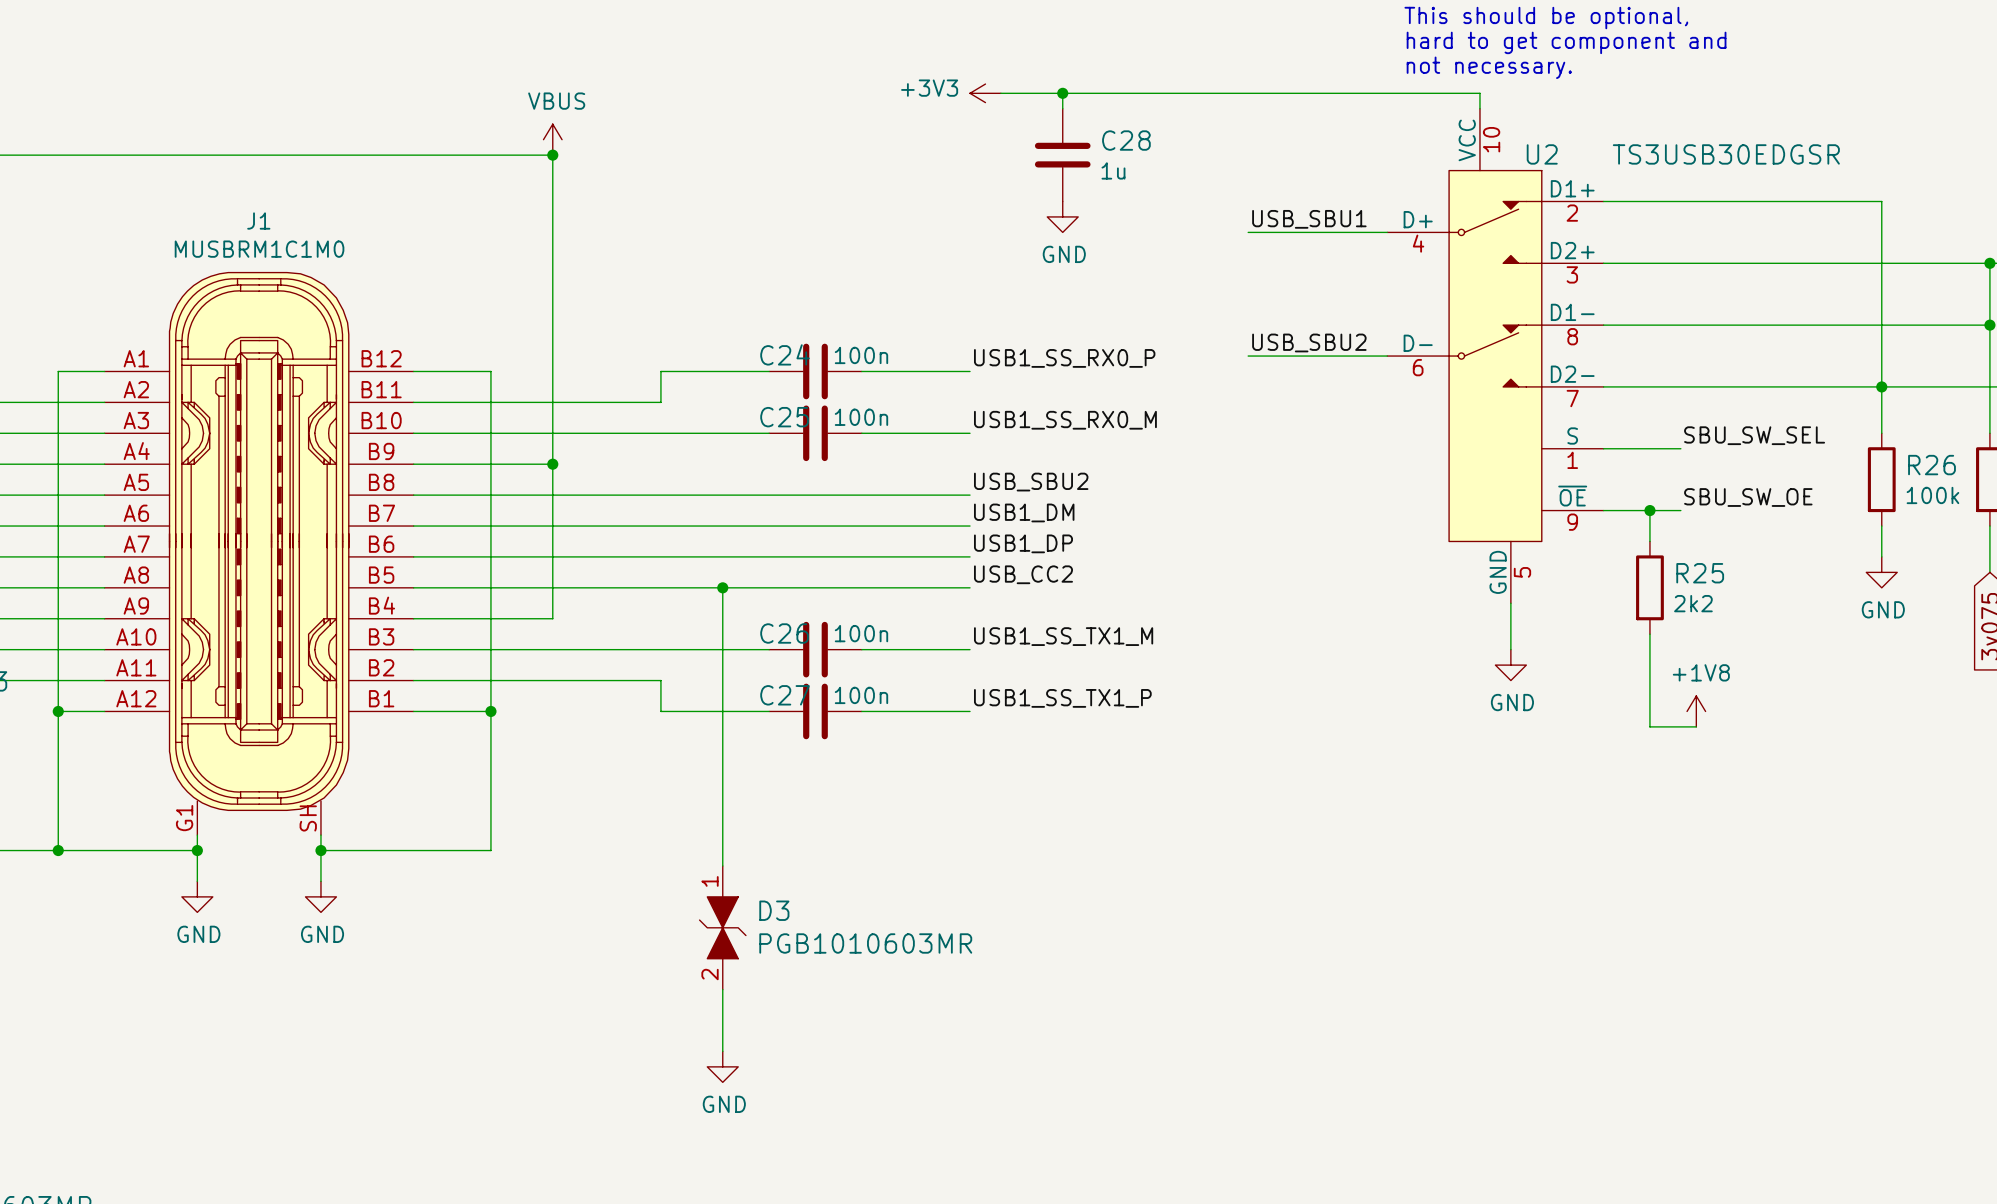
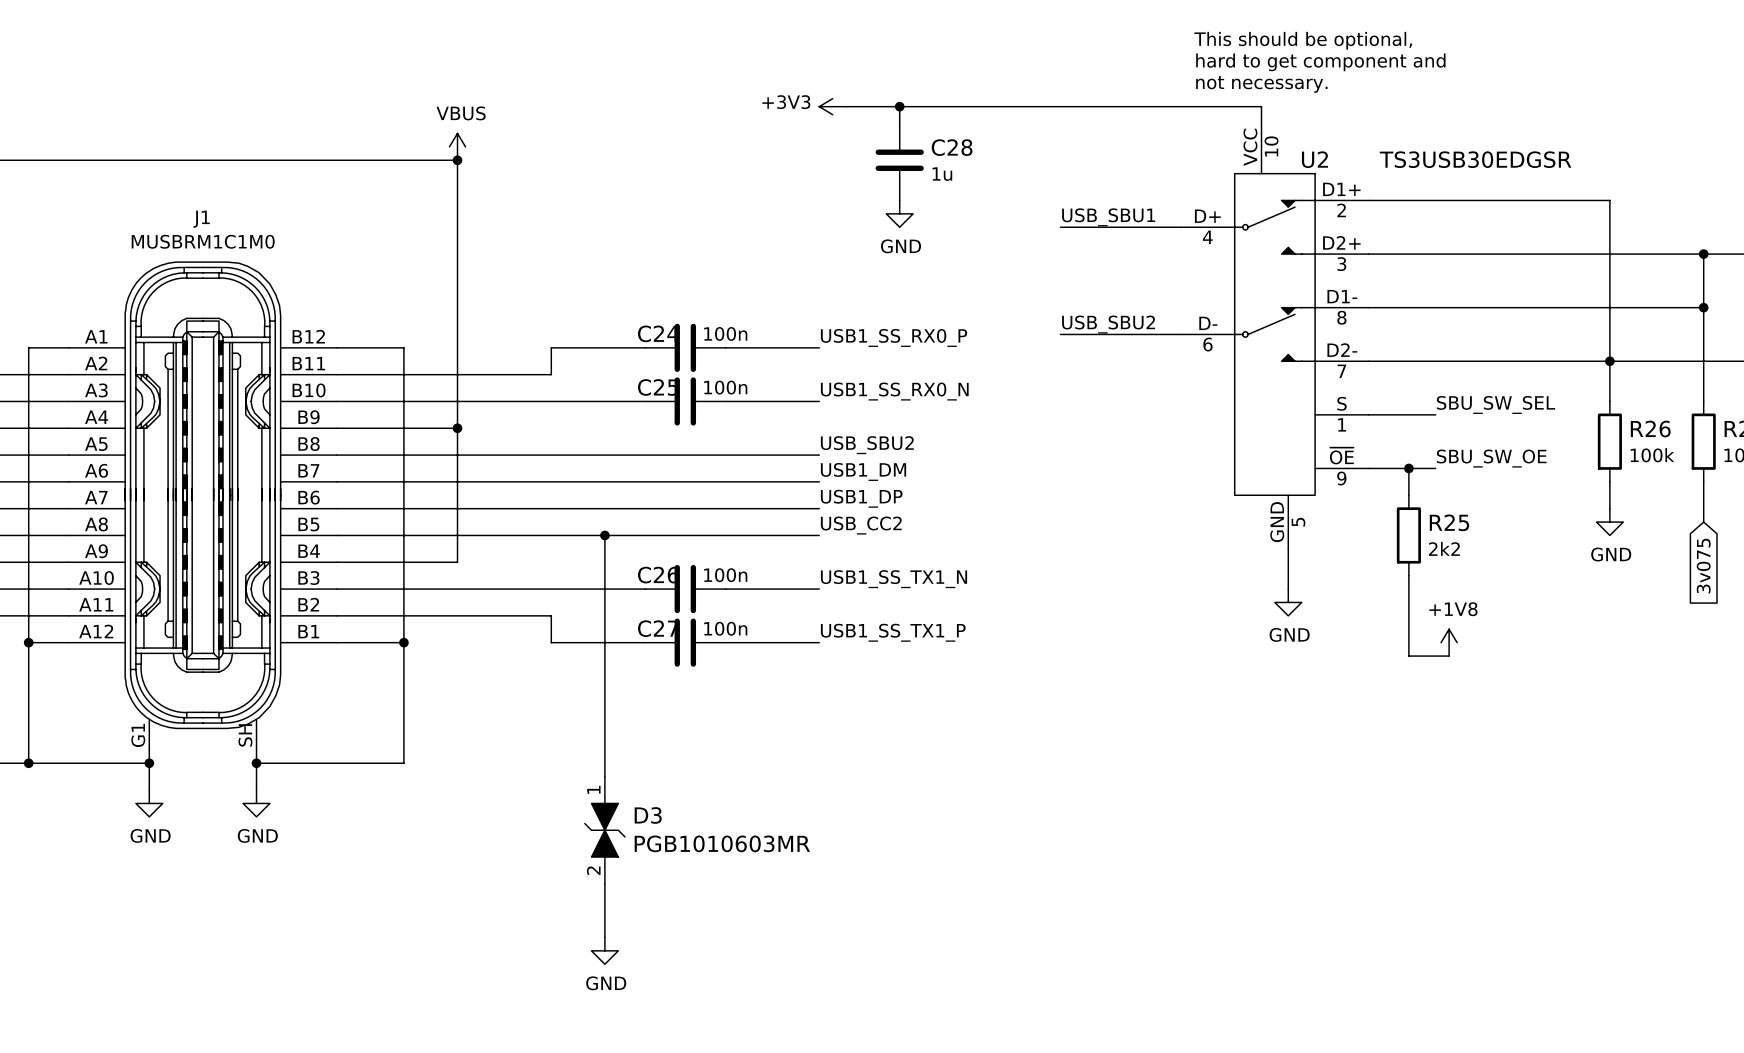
label: USB1_SS_RX0_M (1065, 420) -> USB1_SS_RX0_N (894, 391)
label: USB1_SS_TX1_M (1063, 636) -> USB1_SS_TX1_N (893, 579)

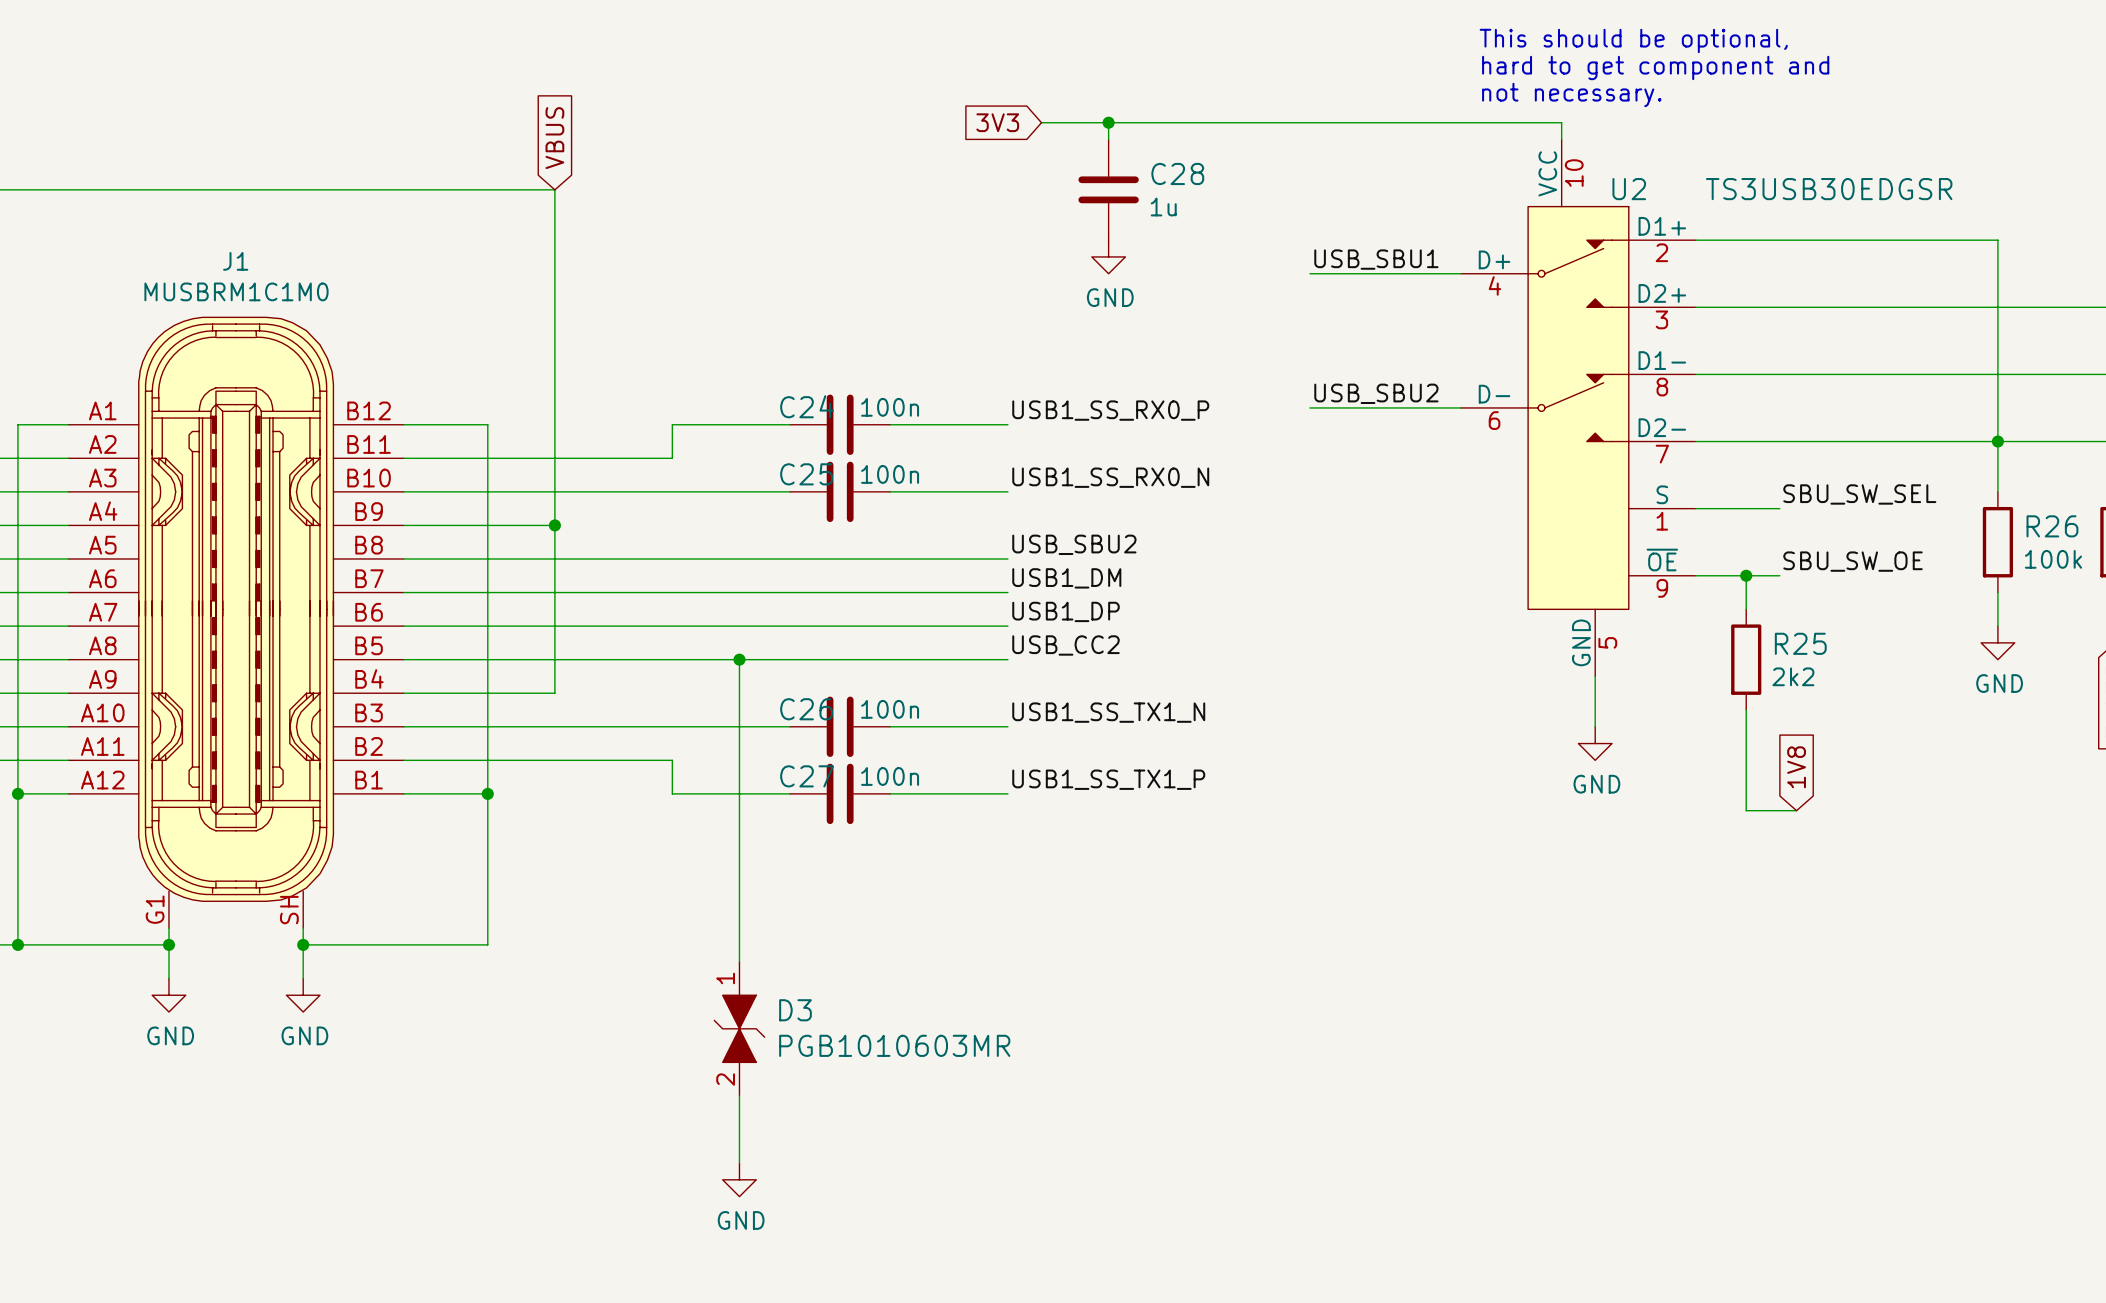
global label: none -> 3V3 (997, 122)
power symbol: +3V3 (832, 106) -> none
global label: none -> VBUS (554, 138)
power symbol: VBUS (457, 146) -> none
junction: (457, 160) -> none
global label: none -> 1V8 (1796, 767)
power symbol: +1V8 (1449, 642) -> none

